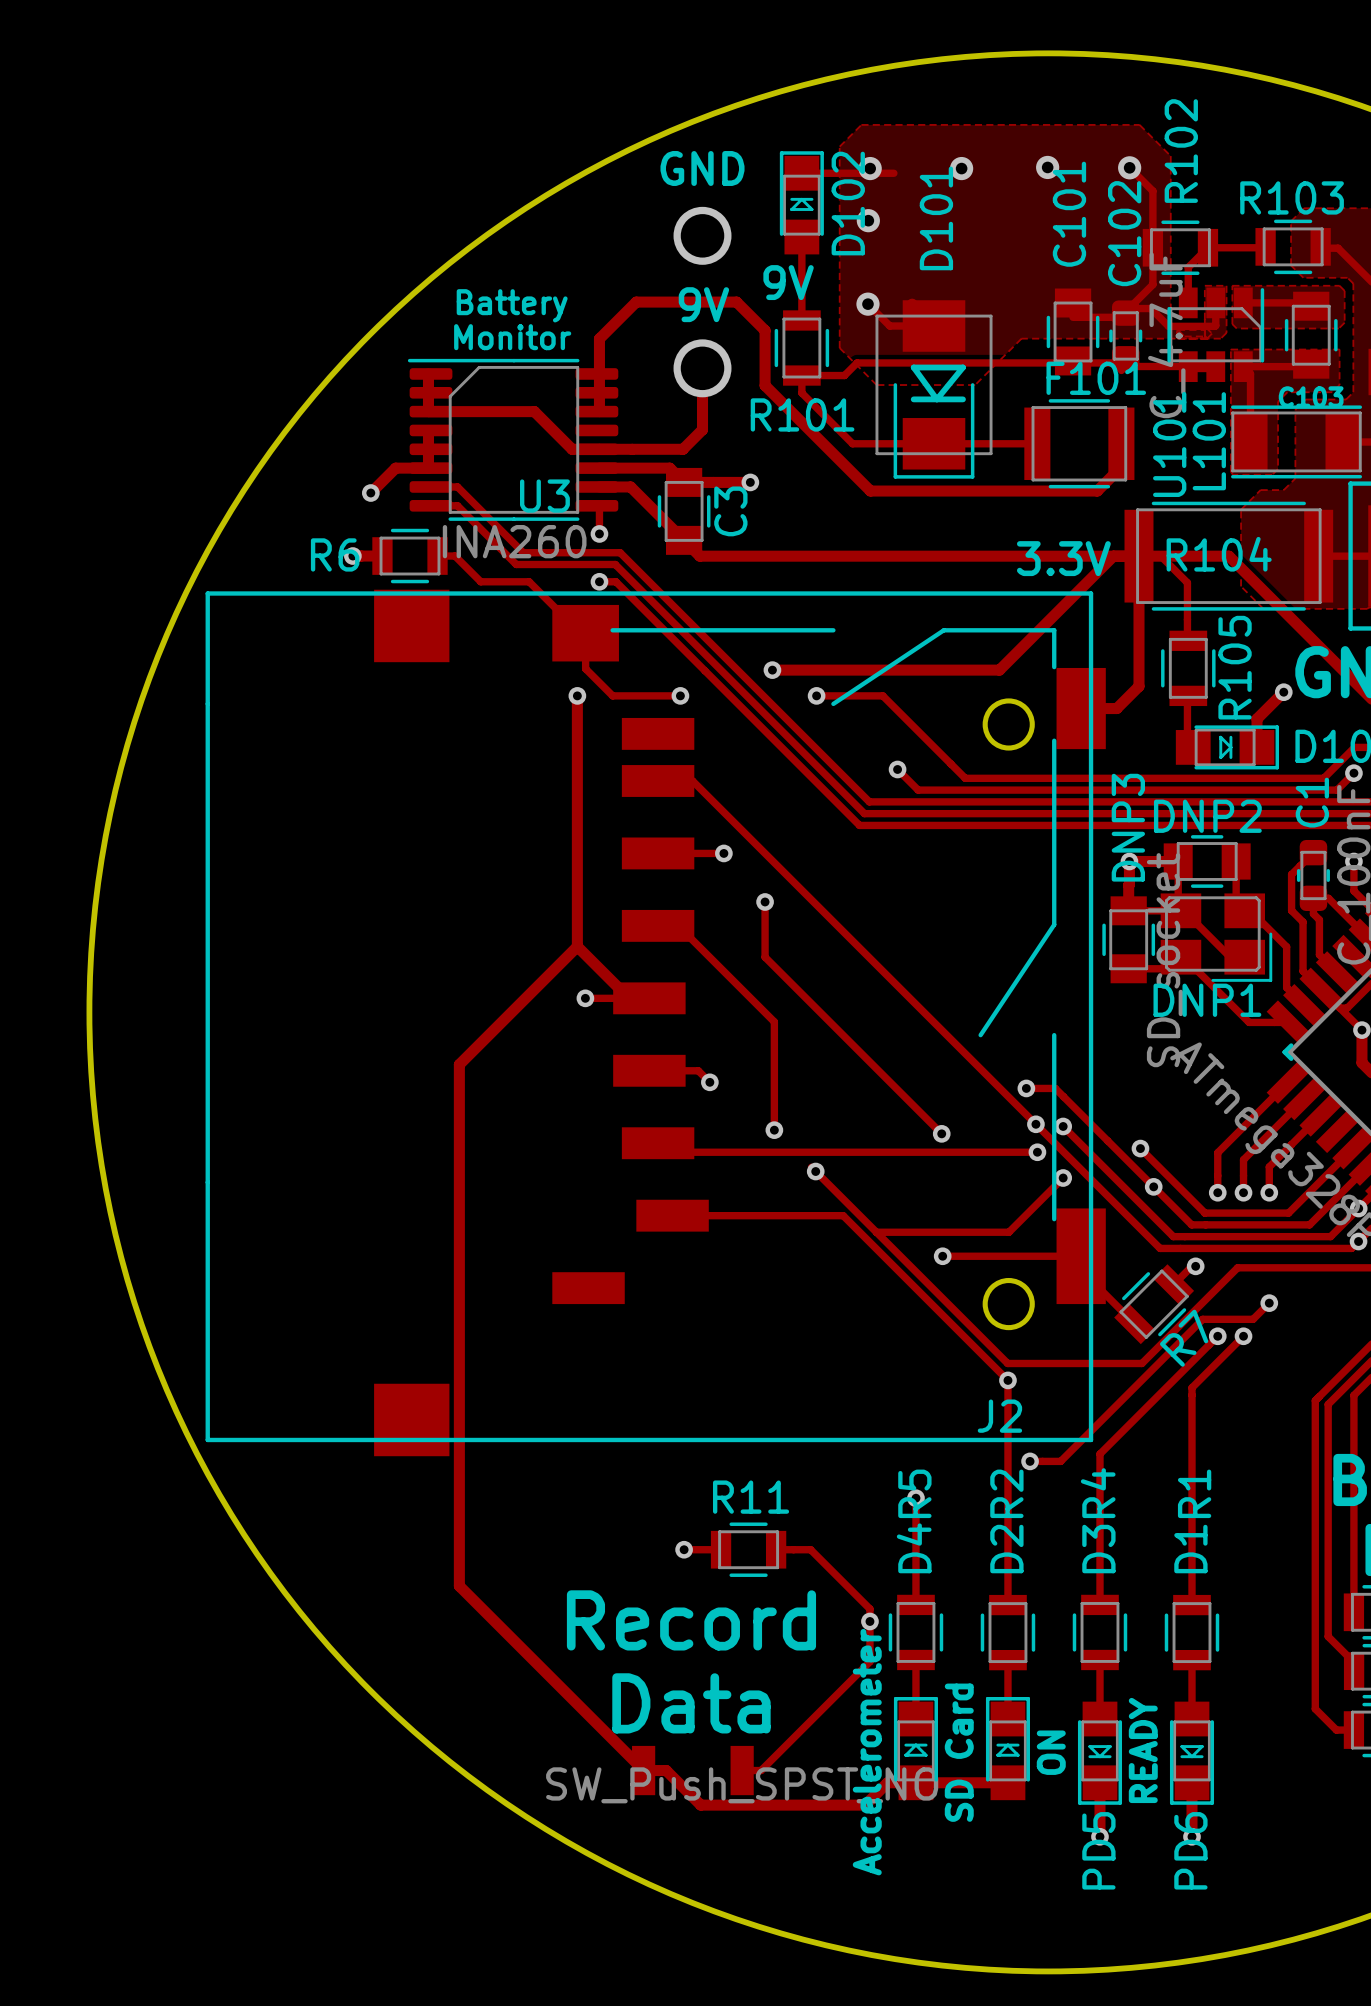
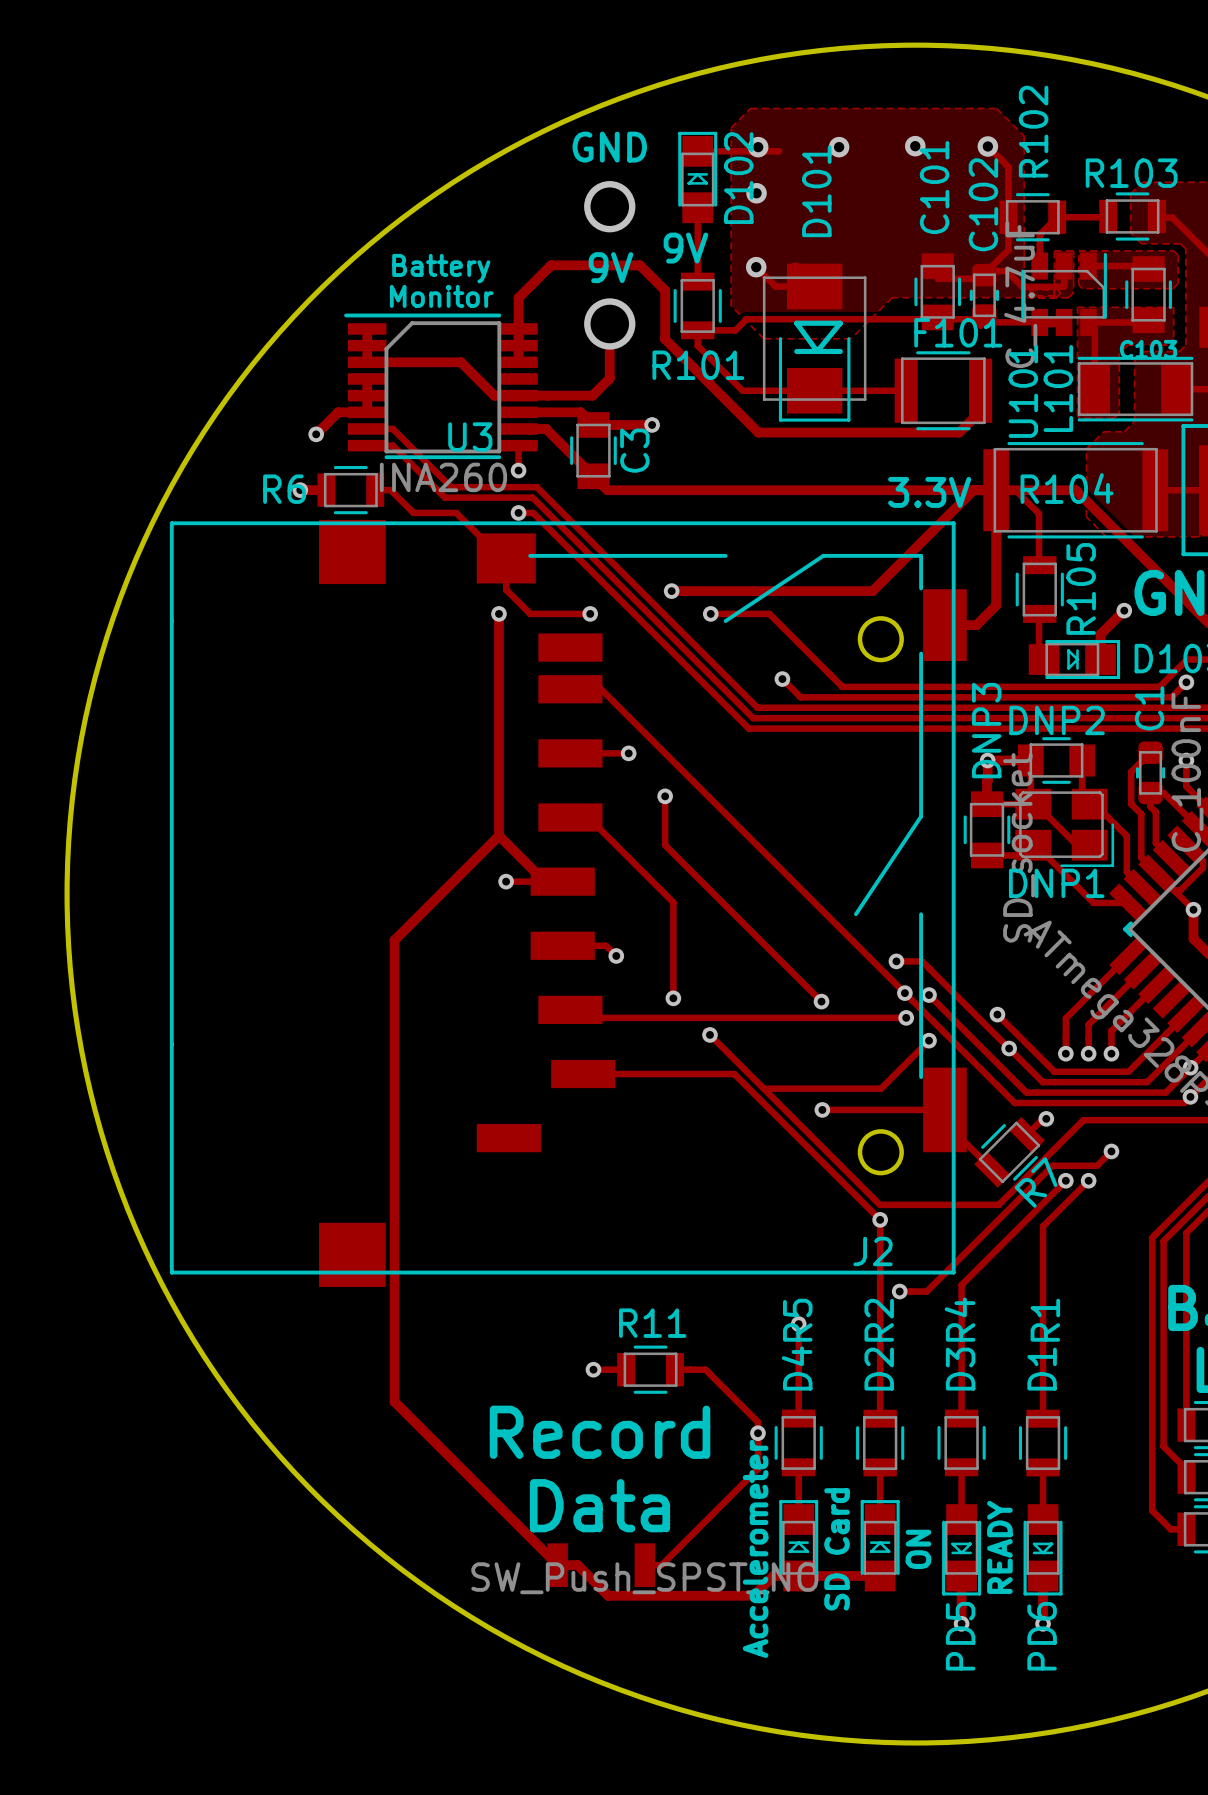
U3 footprint: [407, 358, 619, 521] -> [344, 313, 538, 460]

